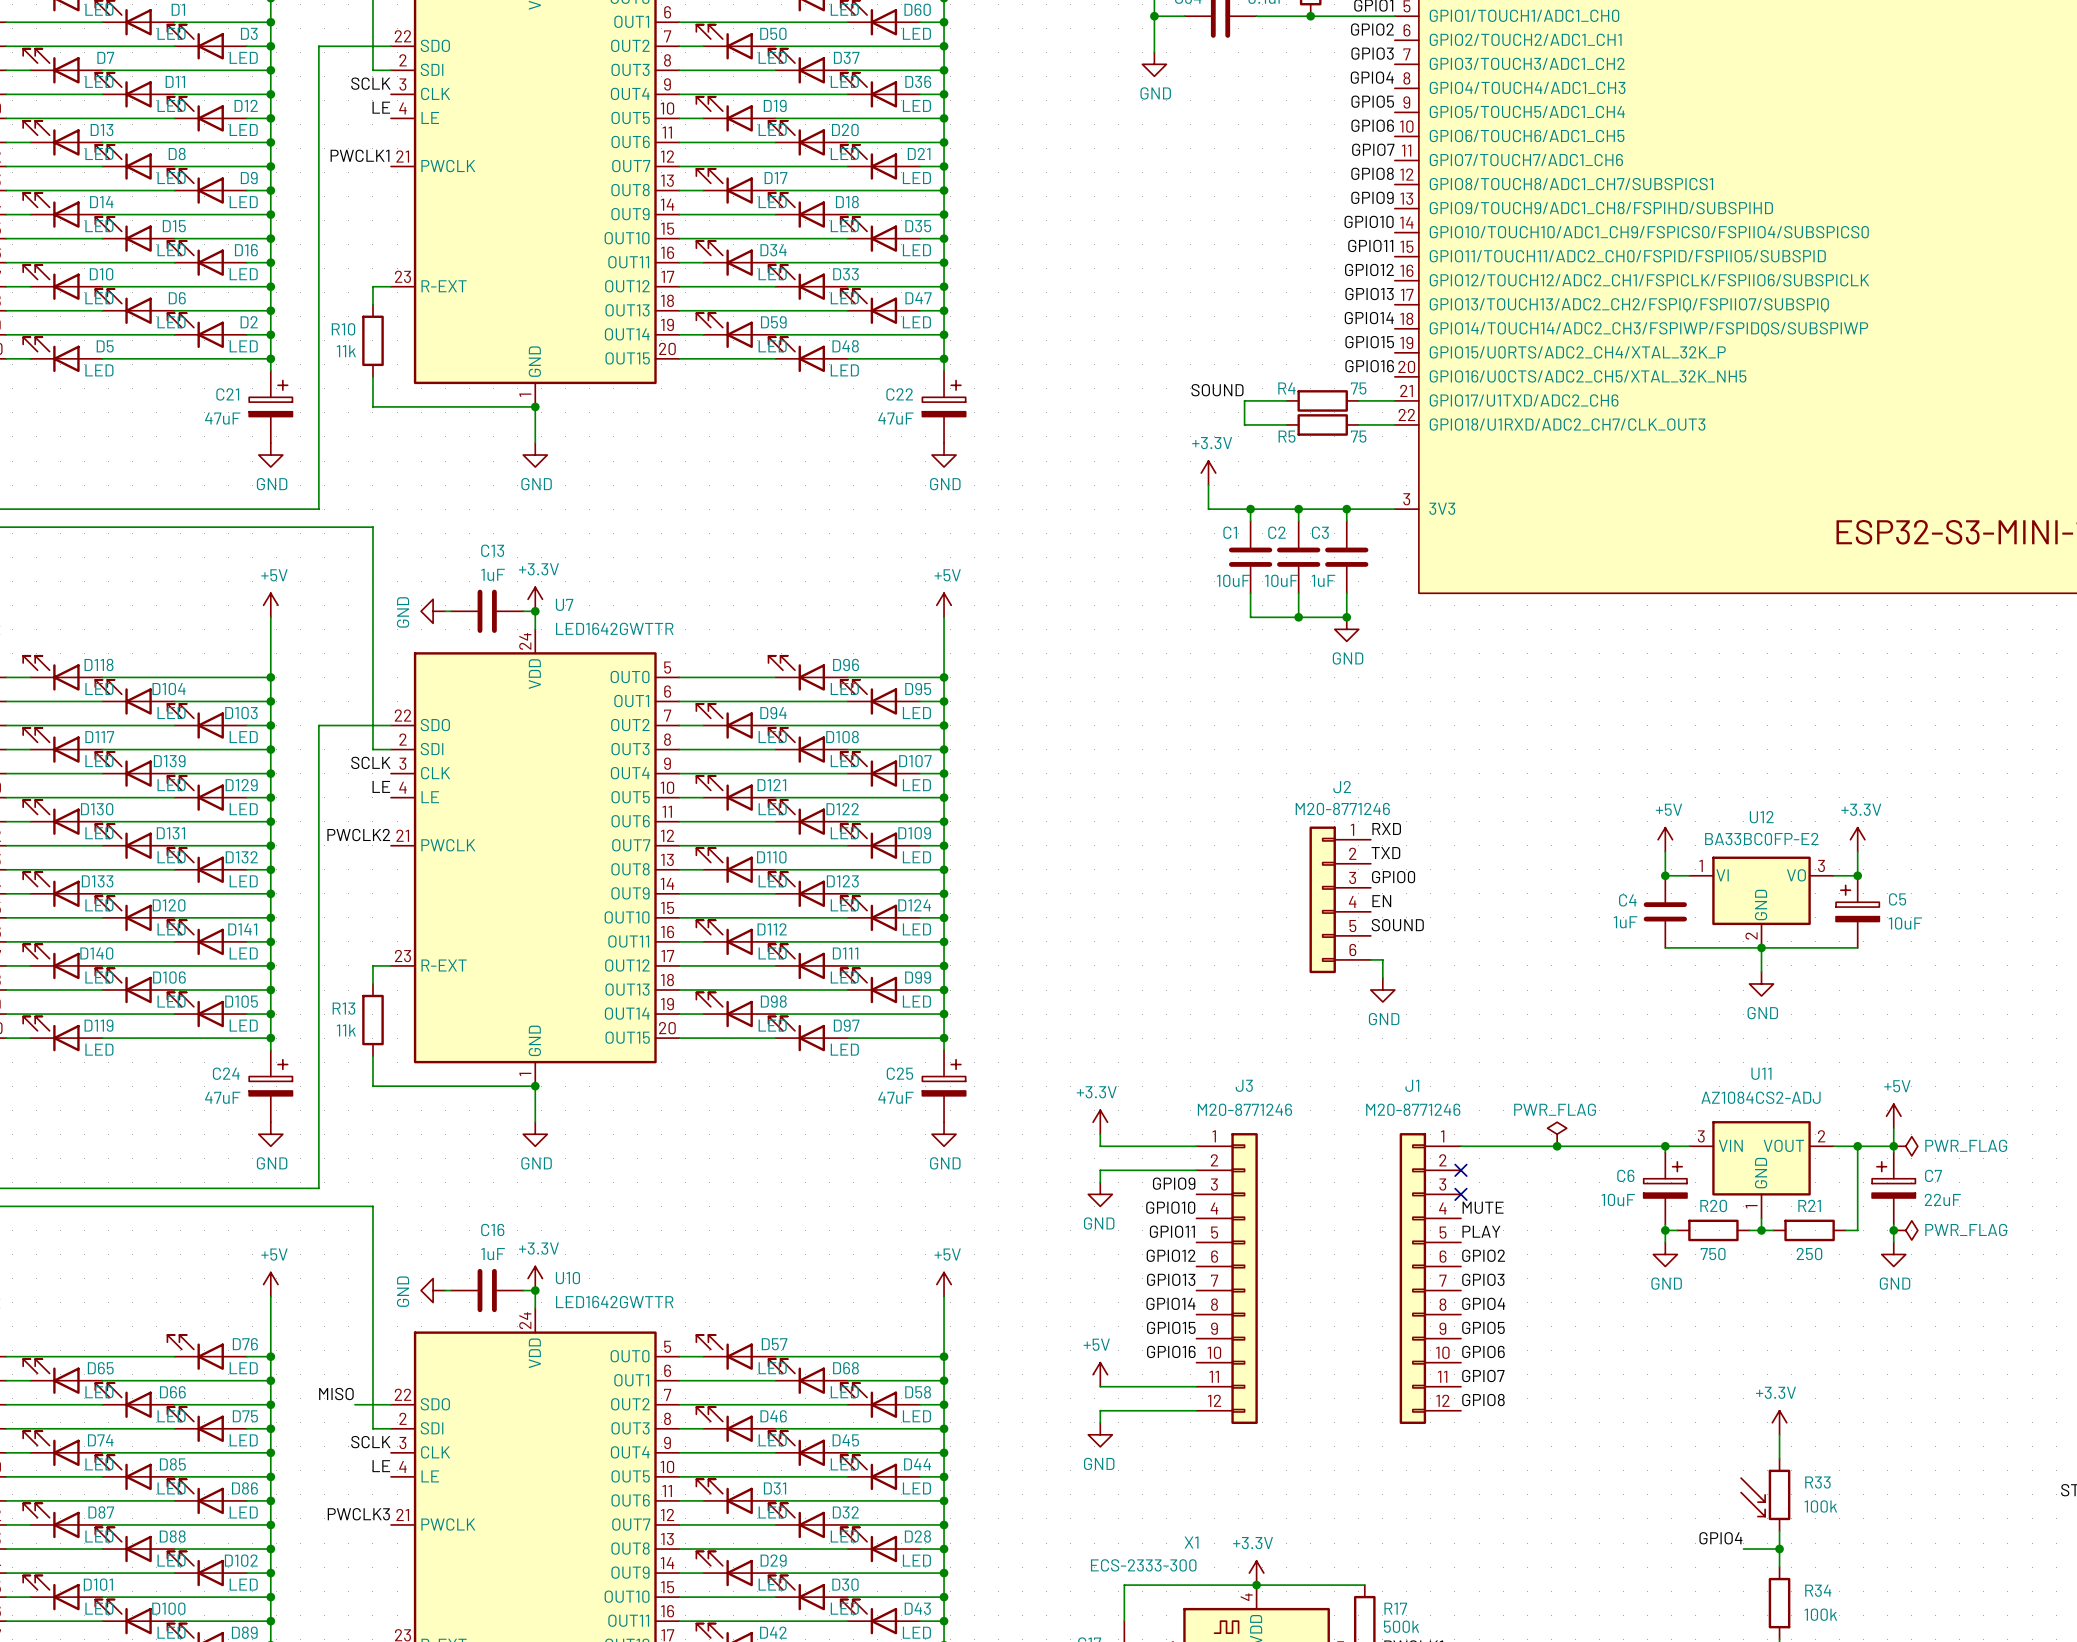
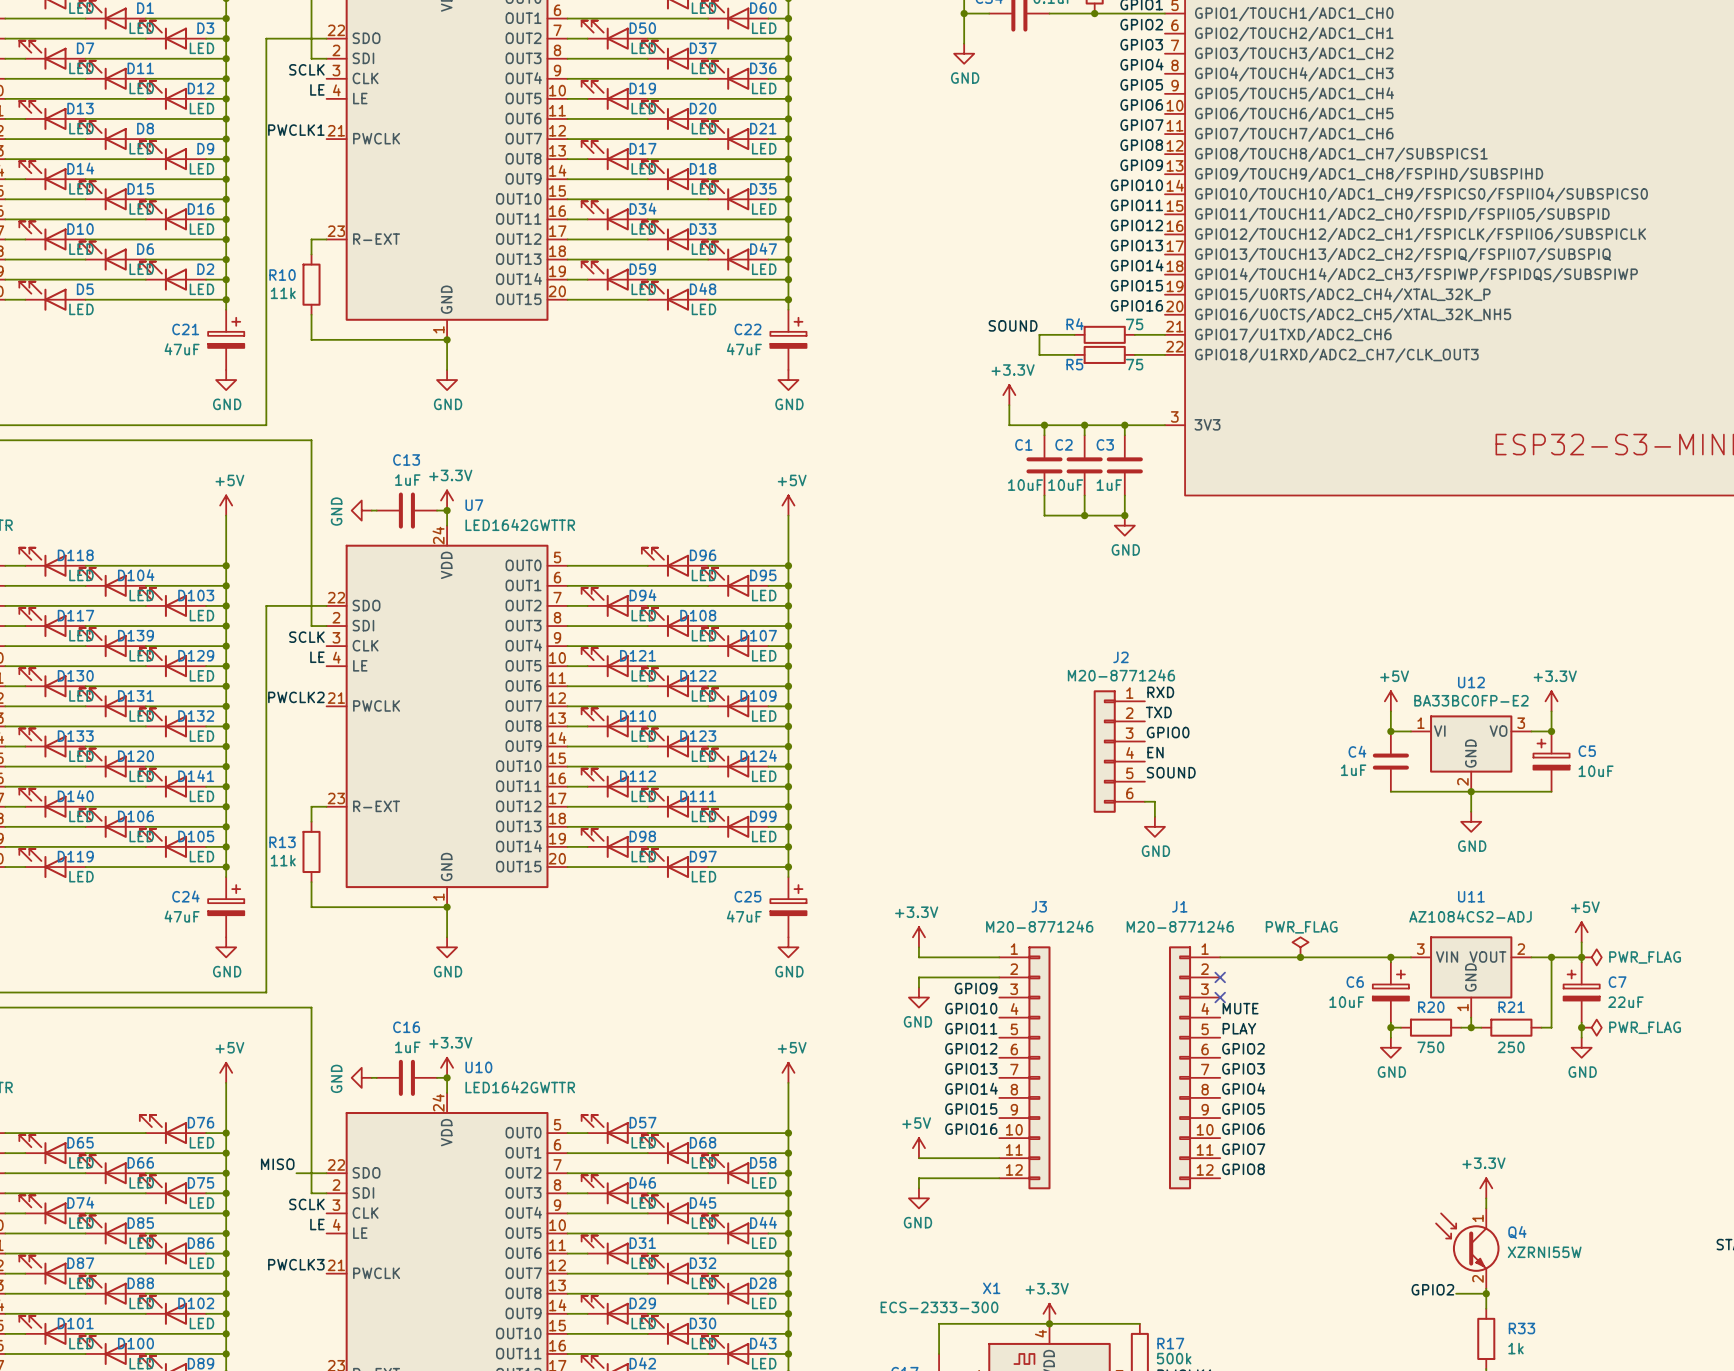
Q4: none -> XZRNI55W (1467, 1248)
R33: 100k (1765, 1494) -> none
label: GPIO4 (1720, 1538) -> GPIO2 (1432, 1289)
R34 name: R34 (1818, 1590) -> R33 (1521, 1328)
R34 value: 100k (1820, 1614) -> 1k (1515, 1348)

